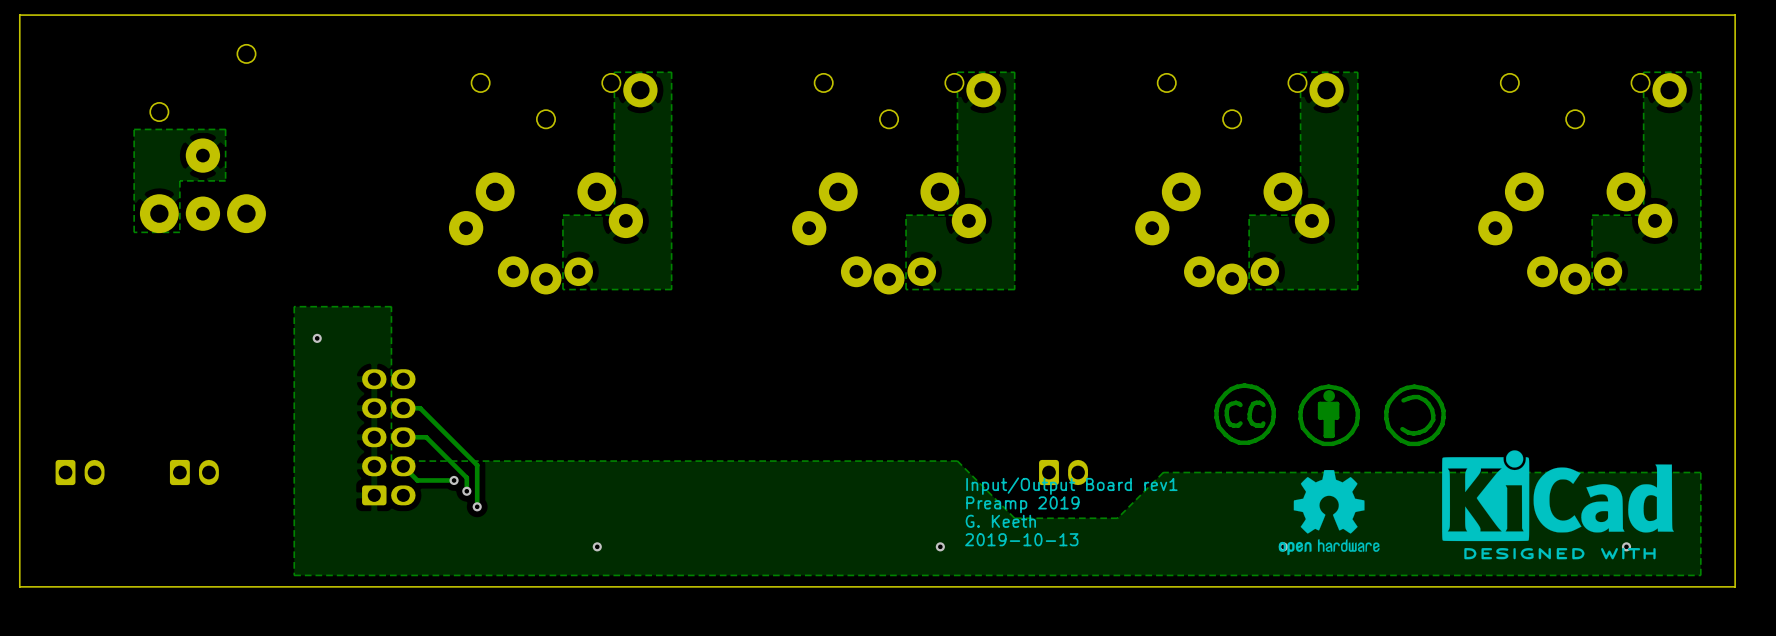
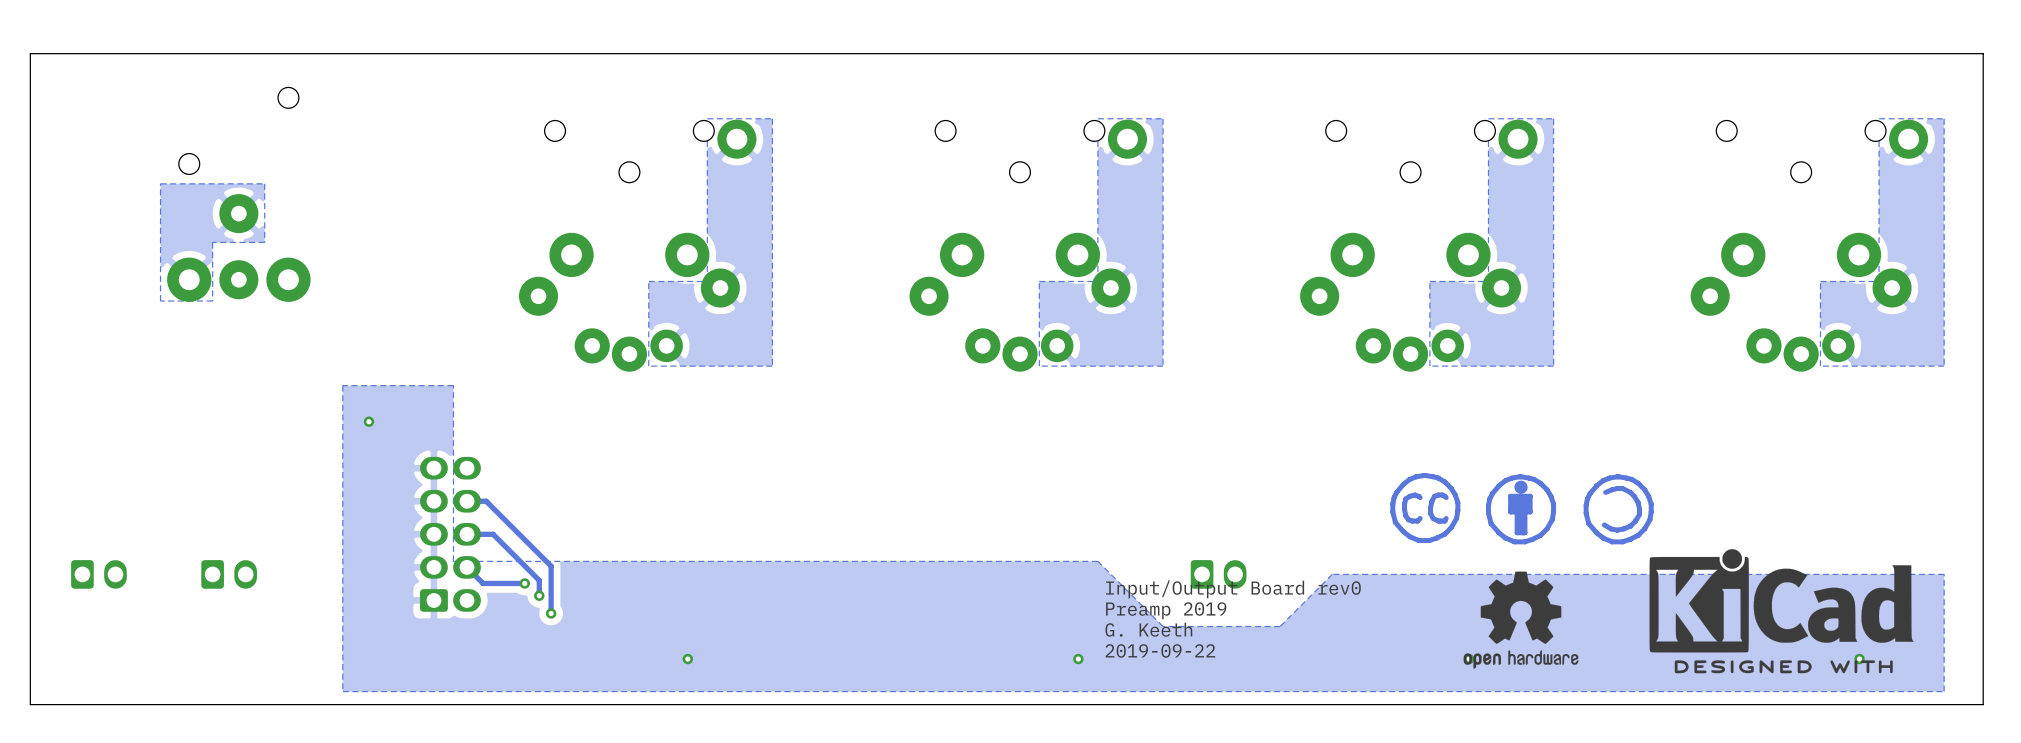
text: Input/Output Board rev1 (1071, 486) -> Input/Output Board rev0 (1233, 589)
text: 2019-10-13 (1021, 539) -> 2019-09-22 (1160, 650)

